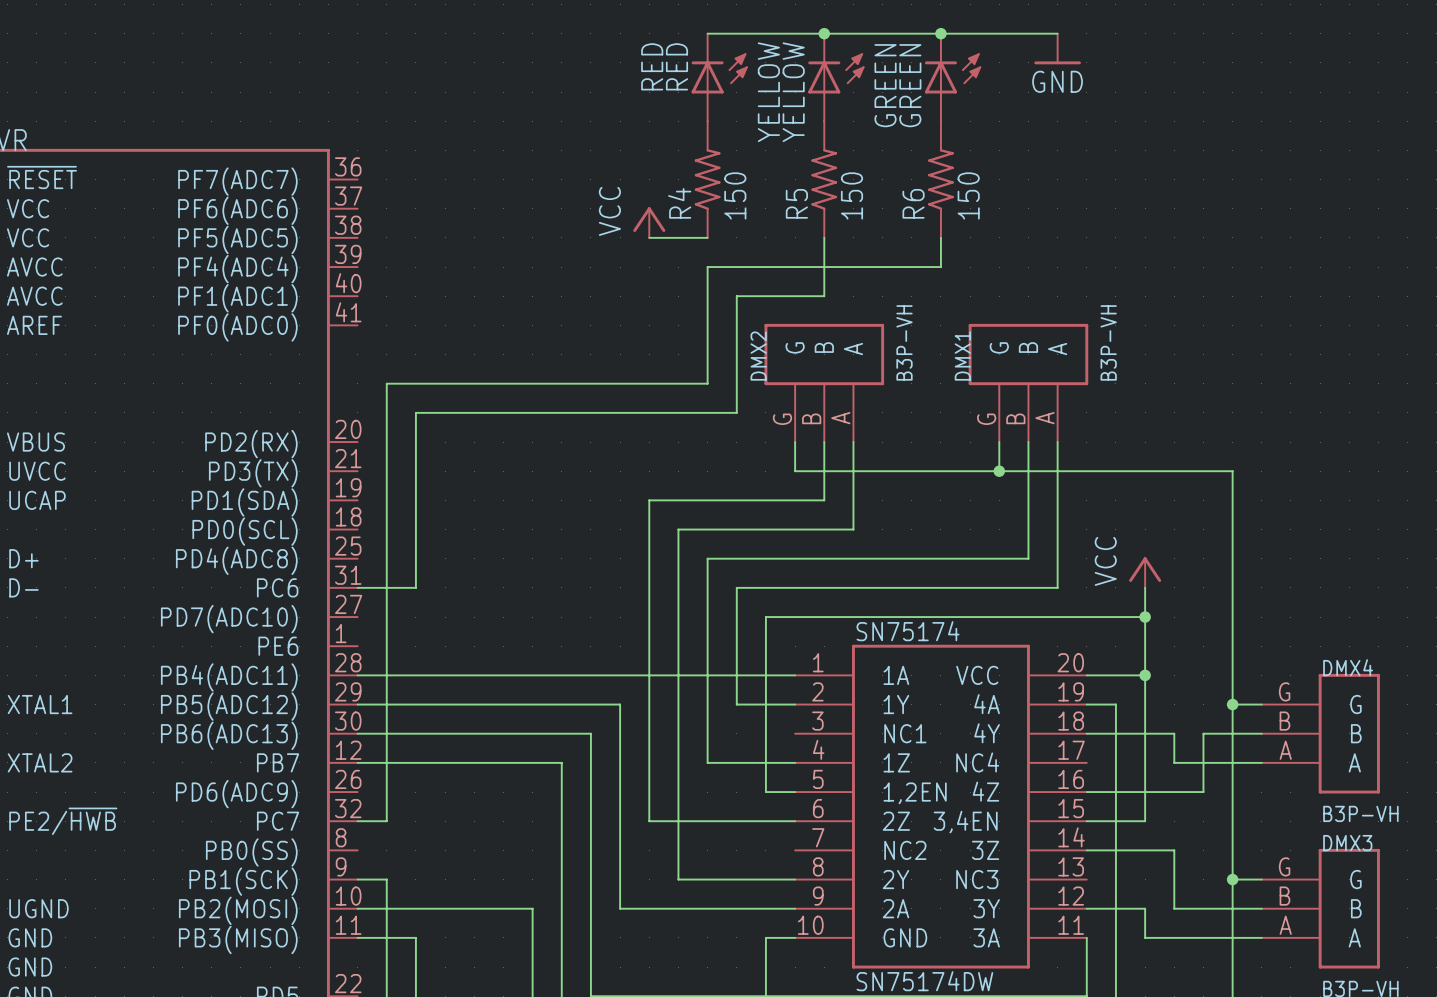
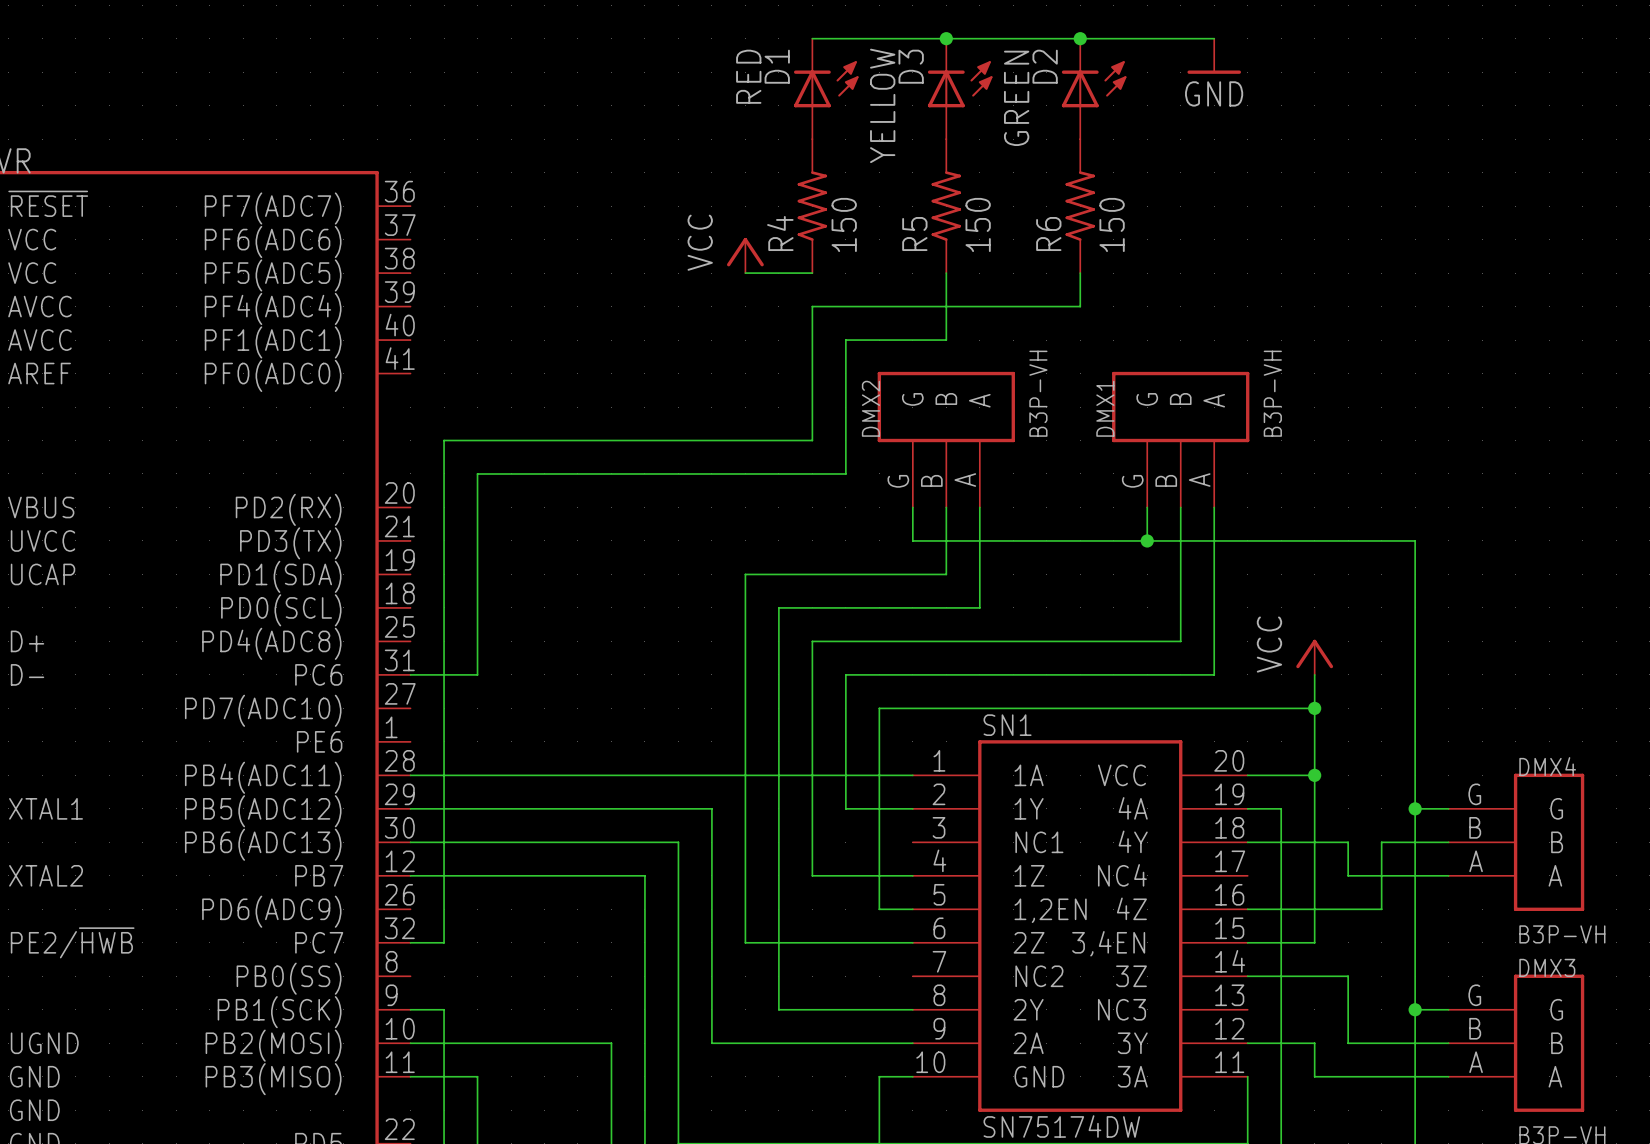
RED name: RED (676, 66) -> D1 (777, 66)
GREEN name: GREEN (910, 85) -> D2 (1045, 66)
YELLOW name: YELLOW (793, 92) -> D3 (911, 66)
SN75174 name: SN75174 (908, 631) -> SN1 (1007, 725)

